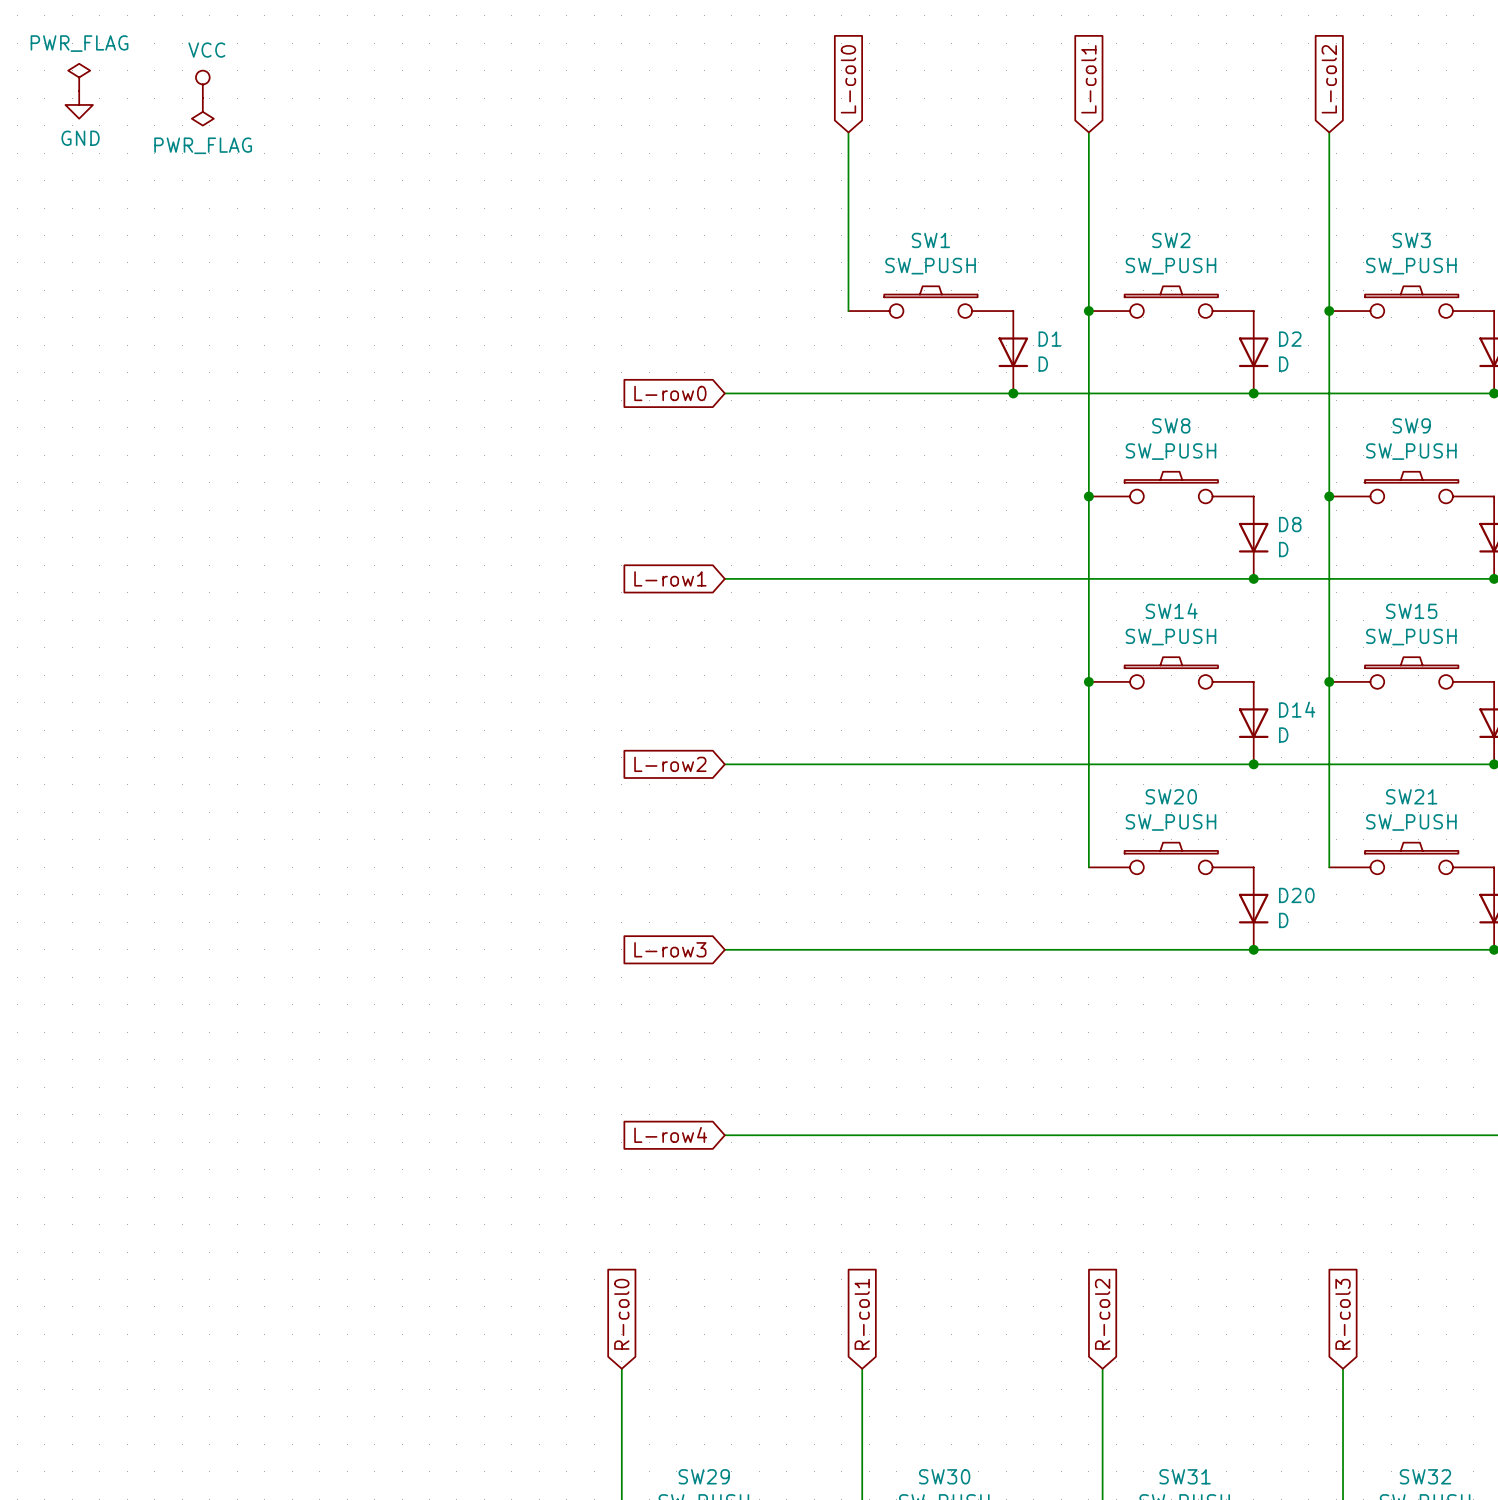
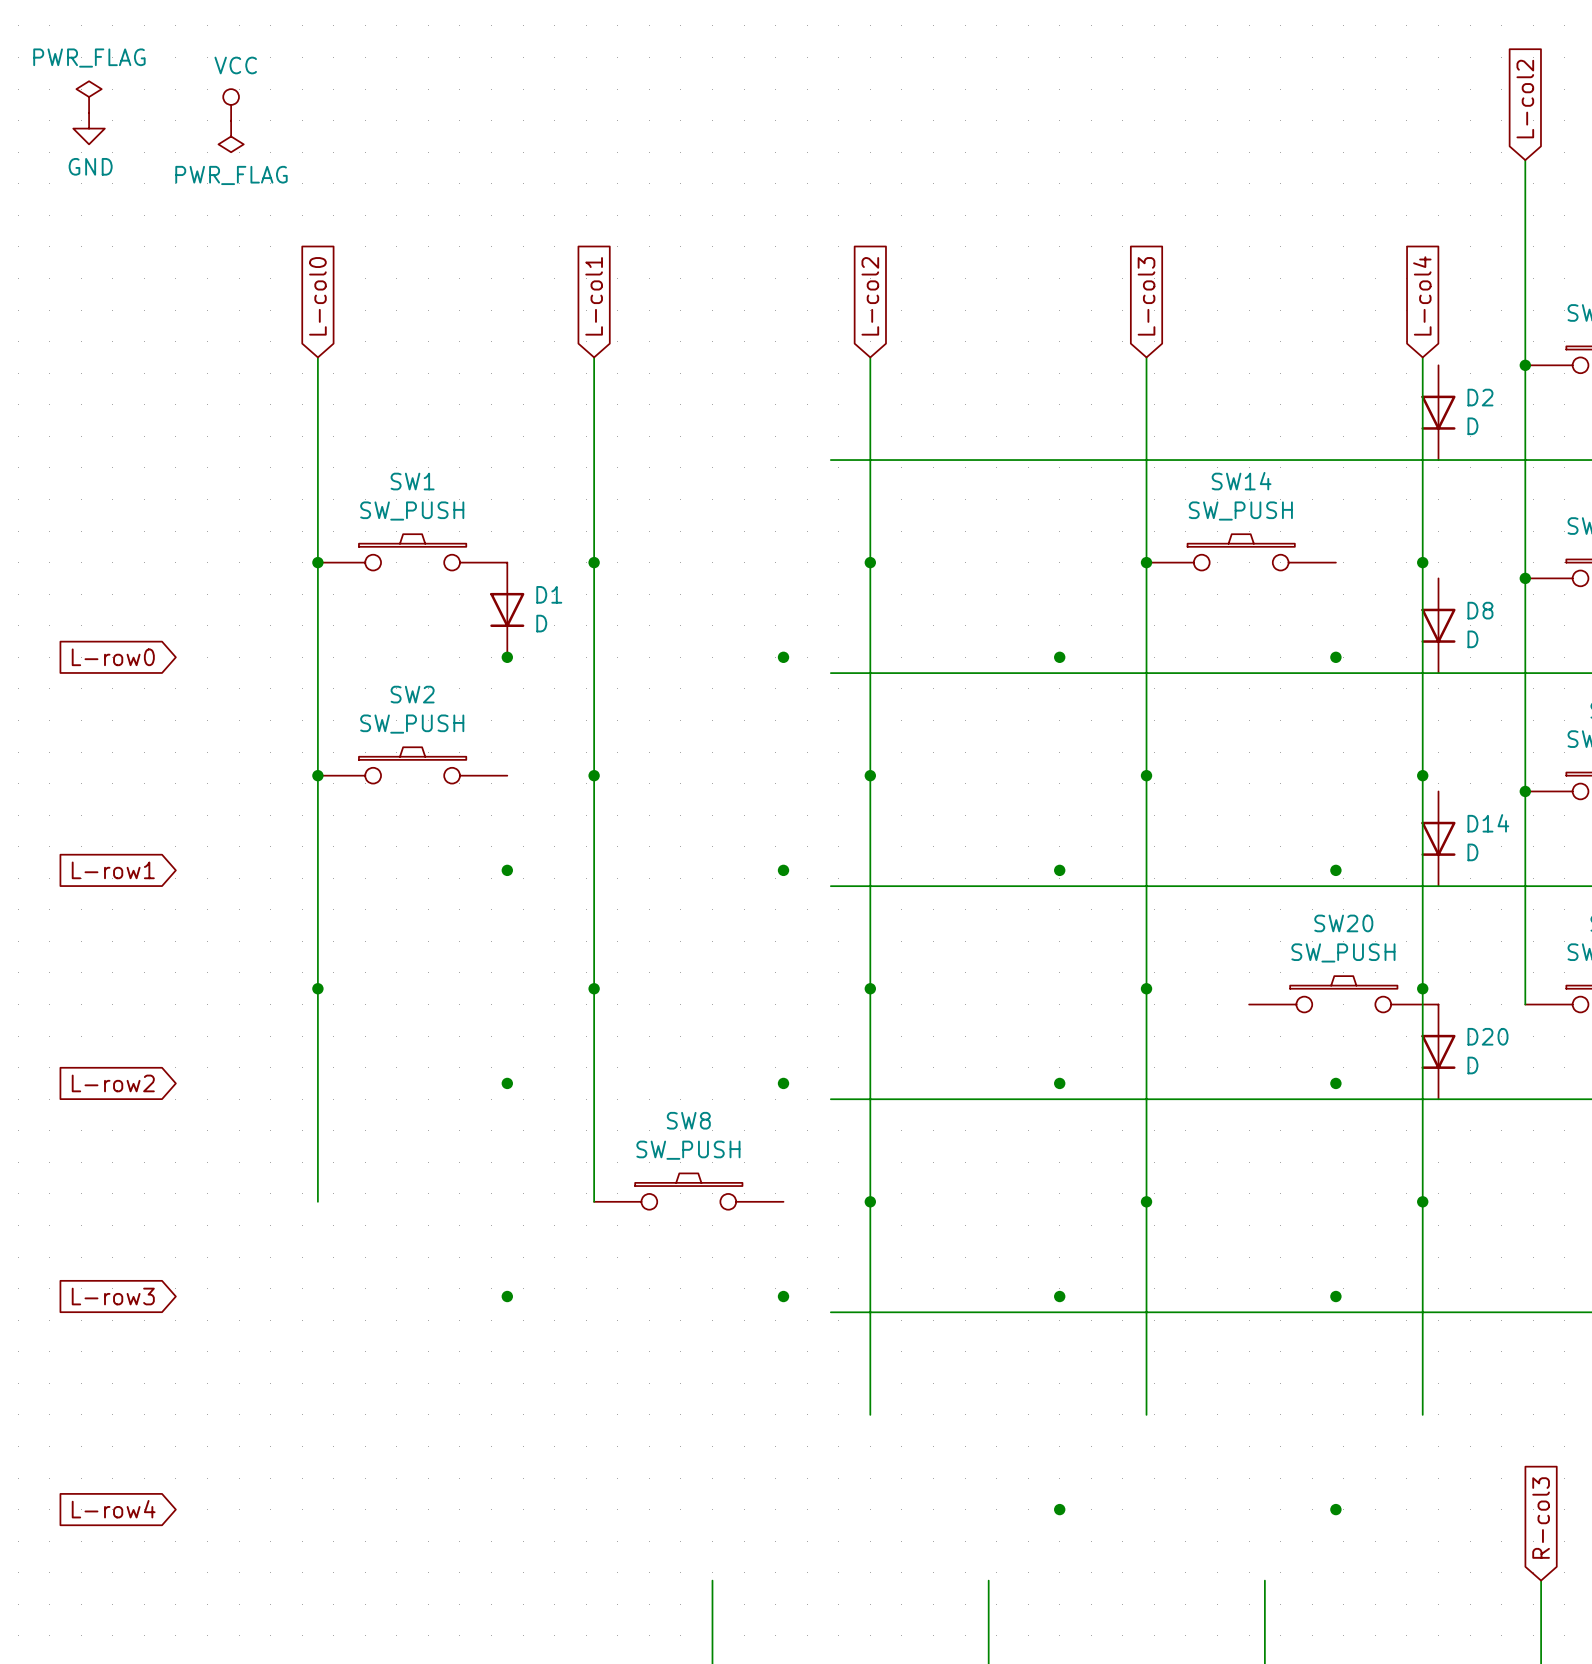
global label: L-col0 (848, 79) -> none
global label: L-col1 (1088, 79) -> none
wire: (848, 132) (848, 311) -> none
wire: (1088, 132) (1088, 867) -> none
global label: none -> L-col0 (317, 296)
global label: none -> L-col1 (594, 296)
global label: none -> L-col2 (870, 296)
global label: none -> L-col3 (1146, 296)
global label: none -> L-col4 (1422, 295)
SW1 position: (930, 302) -> (412, 552)
SW2 position: (1171, 302) -> (412, 765)
wire: none -> (317, 357) (317, 1201)
wire: none -> (594, 357) (594, 1201)
wire: none -> (870, 357) (870, 1414)
wire: none -> (1146, 357) (1146, 1414)
wire: none -> (1422, 357) (1422, 1414)
junction: (1088, 311) -> none
D1 position: (1013, 352) -> (507, 609)
global label: L-row0 (670, 393) -> none
junction: (1013, 393) -> none
junction: (1253, 393) -> none
junction: none -> (317, 562)
junction: none -> (594, 562)
junction: none -> (870, 562)
junction: none -> (1146, 562)
junction: none -> (1422, 562)
SW8 position: (1171, 487) -> (688, 1191)
junction: (1088, 496) -> none
global label: none -> L-row0 (113, 657)
junction: none -> (507, 657)
junction: none -> (783, 657)
junction: none -> (1059, 657)
junction: none -> (1335, 657)
global label: L-row1 (670, 578) -> none
junction: (1253, 578) -> none
junction: none -> (317, 775)
junction: none -> (594, 775)
junction: none -> (870, 775)
junction: none -> (1146, 775)
junction: none -> (1422, 775)
SW14 position: (1171, 673) -> (1241, 552)
junction: (1088, 681) -> none
global label: none -> L-row1 (113, 870)
junction: none -> (507, 870)
junction: none -> (783, 870)
junction: none -> (1059, 870)
junction: none -> (1335, 870)
global label: L-row2 (670, 764) -> none
junction: (1253, 764) -> none
junction: none -> (317, 988)
junction: none -> (594, 988)
junction: none -> (870, 988)
junction: none -> (1146, 988)
junction: none -> (1422, 988)
global label: none -> L-row2 (113, 1083)
junction: none -> (507, 1083)
junction: none -> (783, 1083)
junction: none -> (1059, 1083)
junction: none -> (1335, 1083)
global label: L-row3 (670, 949) -> none
junction: (1253, 949) -> none
junction: none -> (870, 1201)
junction: none -> (1146, 1201)
junction: none -> (1422, 1201)
global label: none -> L-row3 (113, 1296)
junction: none -> (507, 1296)
junction: none -> (783, 1296)
junction: none -> (1059, 1296)
junction: none -> (1335, 1296)
global label: L-row4 (670, 1134) -> none
global label: none -> L-row4 (113, 1509)
junction: none -> (1059, 1509)
junction: none -> (1335, 1509)
global label: R-col0 (621, 1314) -> none
global label: R-col1 (862, 1314) -> none
global label: R-col2 (1102, 1314) -> none

